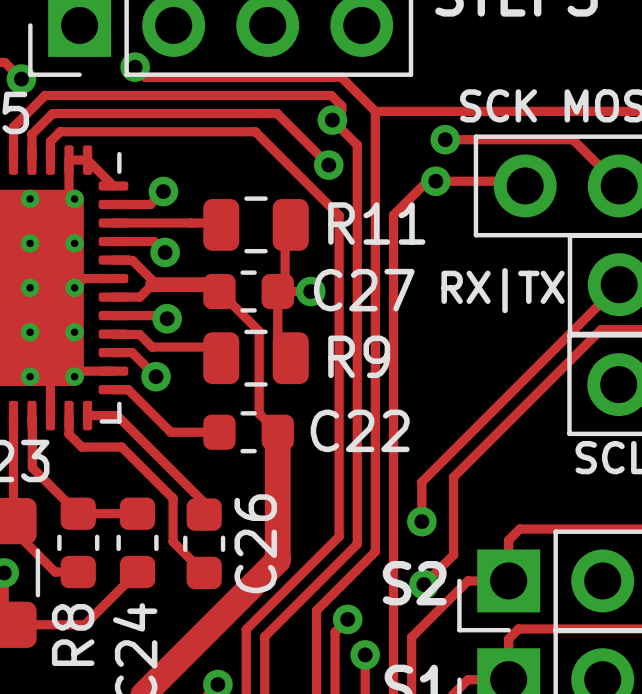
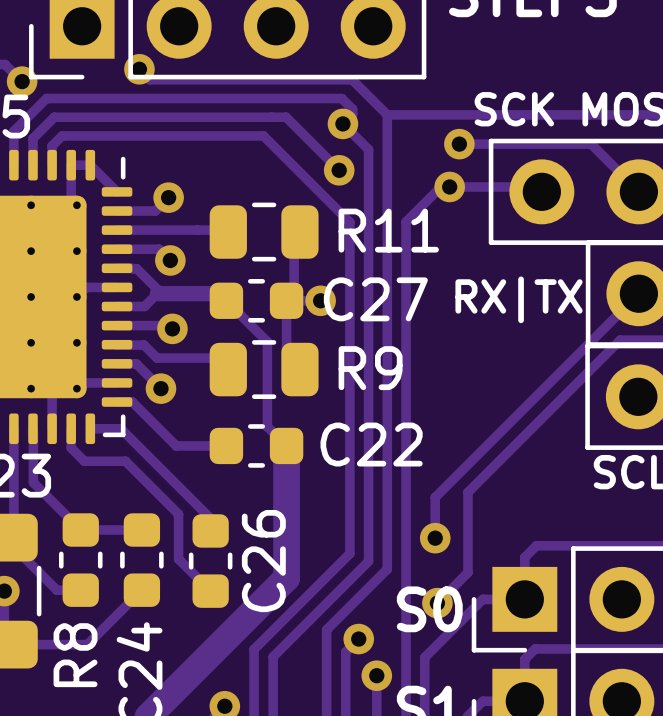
text: S2 (414, 583) -> S0 (429, 609)

